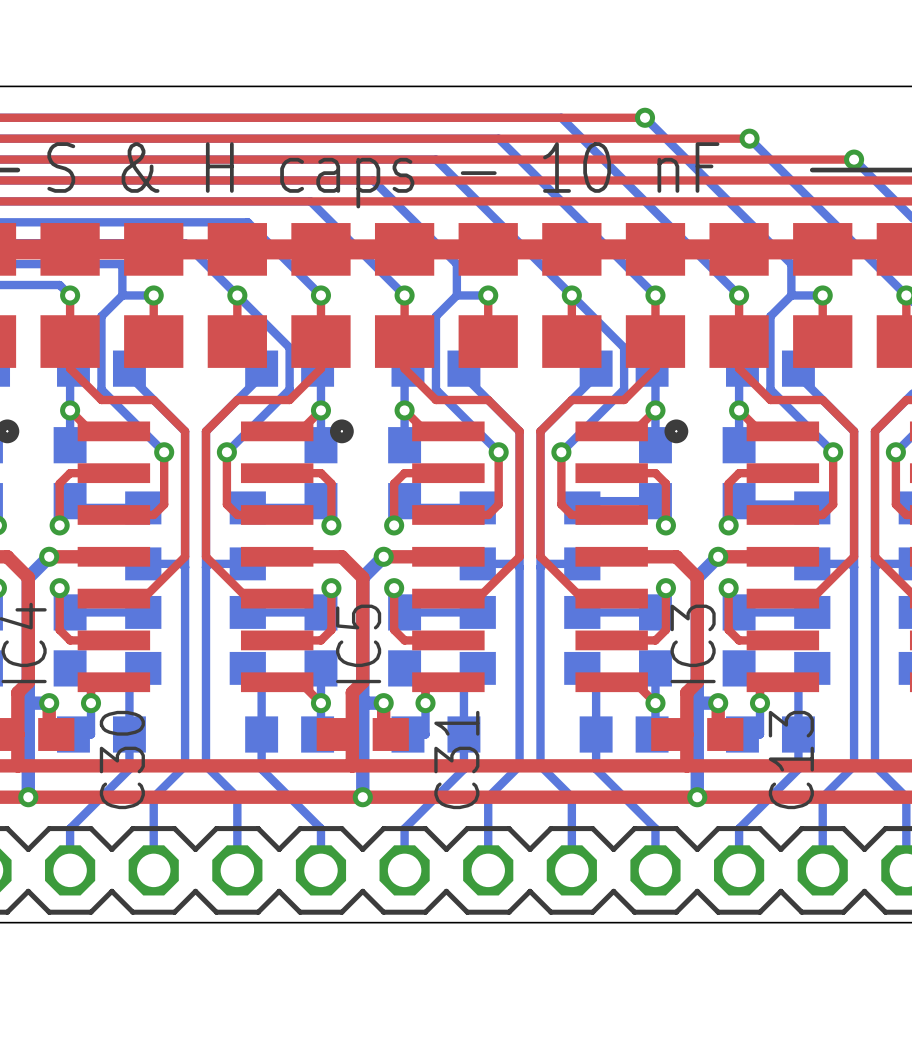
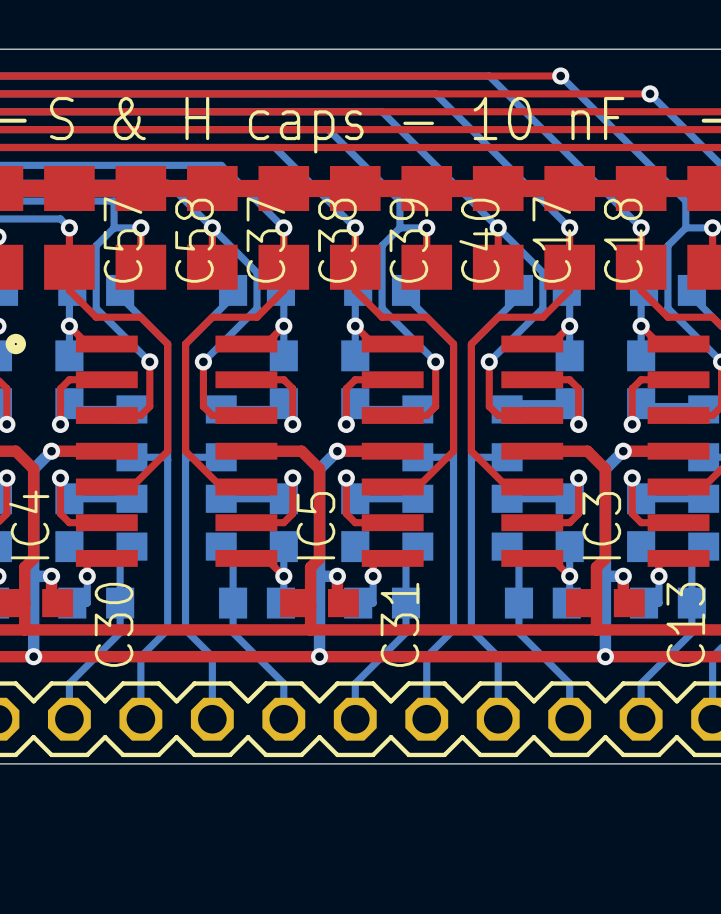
C57 name: none -> C57 (123, 239)
C37 name: none -> C37 (265, 239)
C17 name: none -> C17 (551, 239)
C58 name: none -> C58 (194, 240)
C38 name: none -> C38 (337, 240)
C39 name: none -> C39 (408, 240)
C40 name: none -> C40 (479, 240)
C18 name: none -> C18 (623, 240)
drawing: [329, 419, 354, 444] -> none
drawing: [664, 419, 689, 444] -> none

